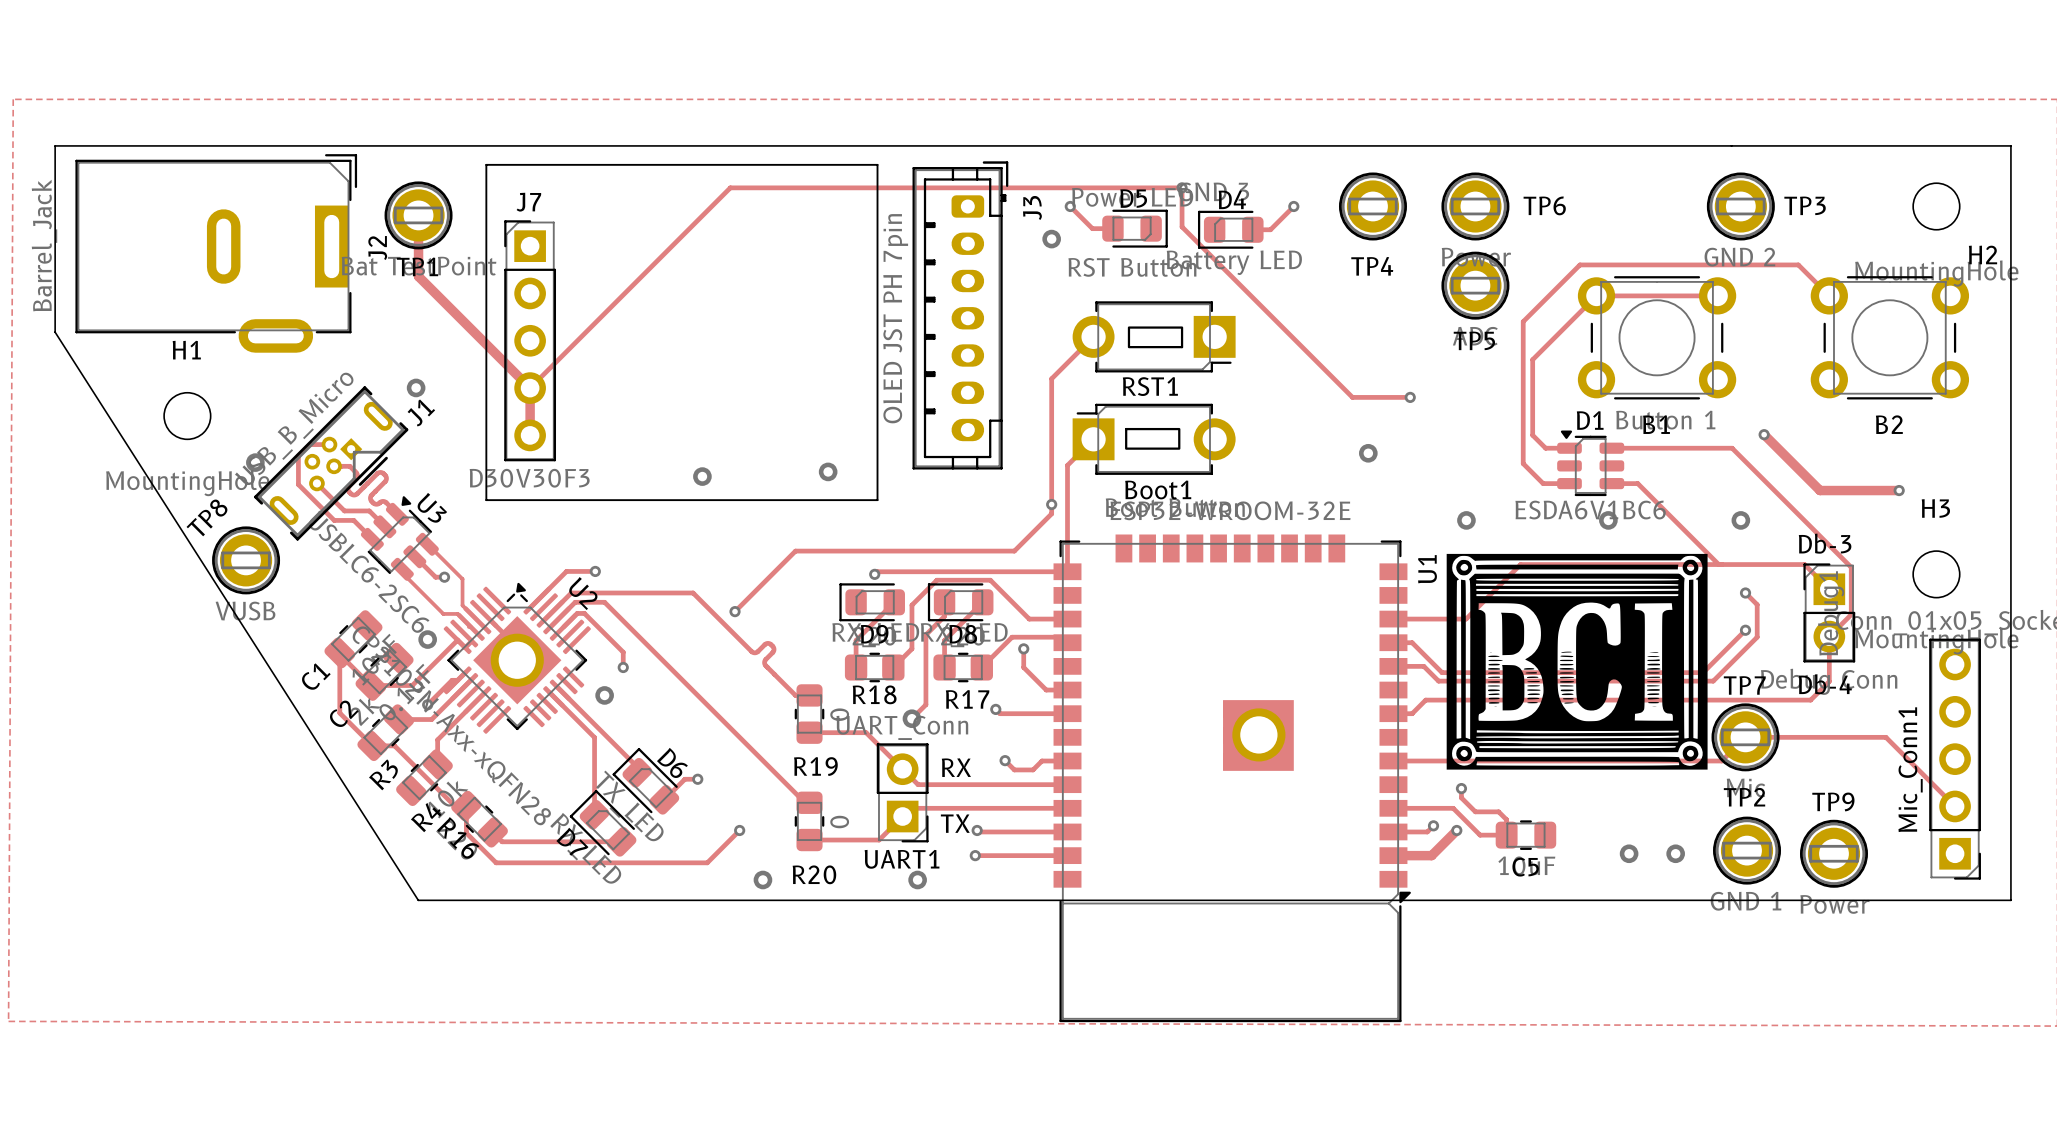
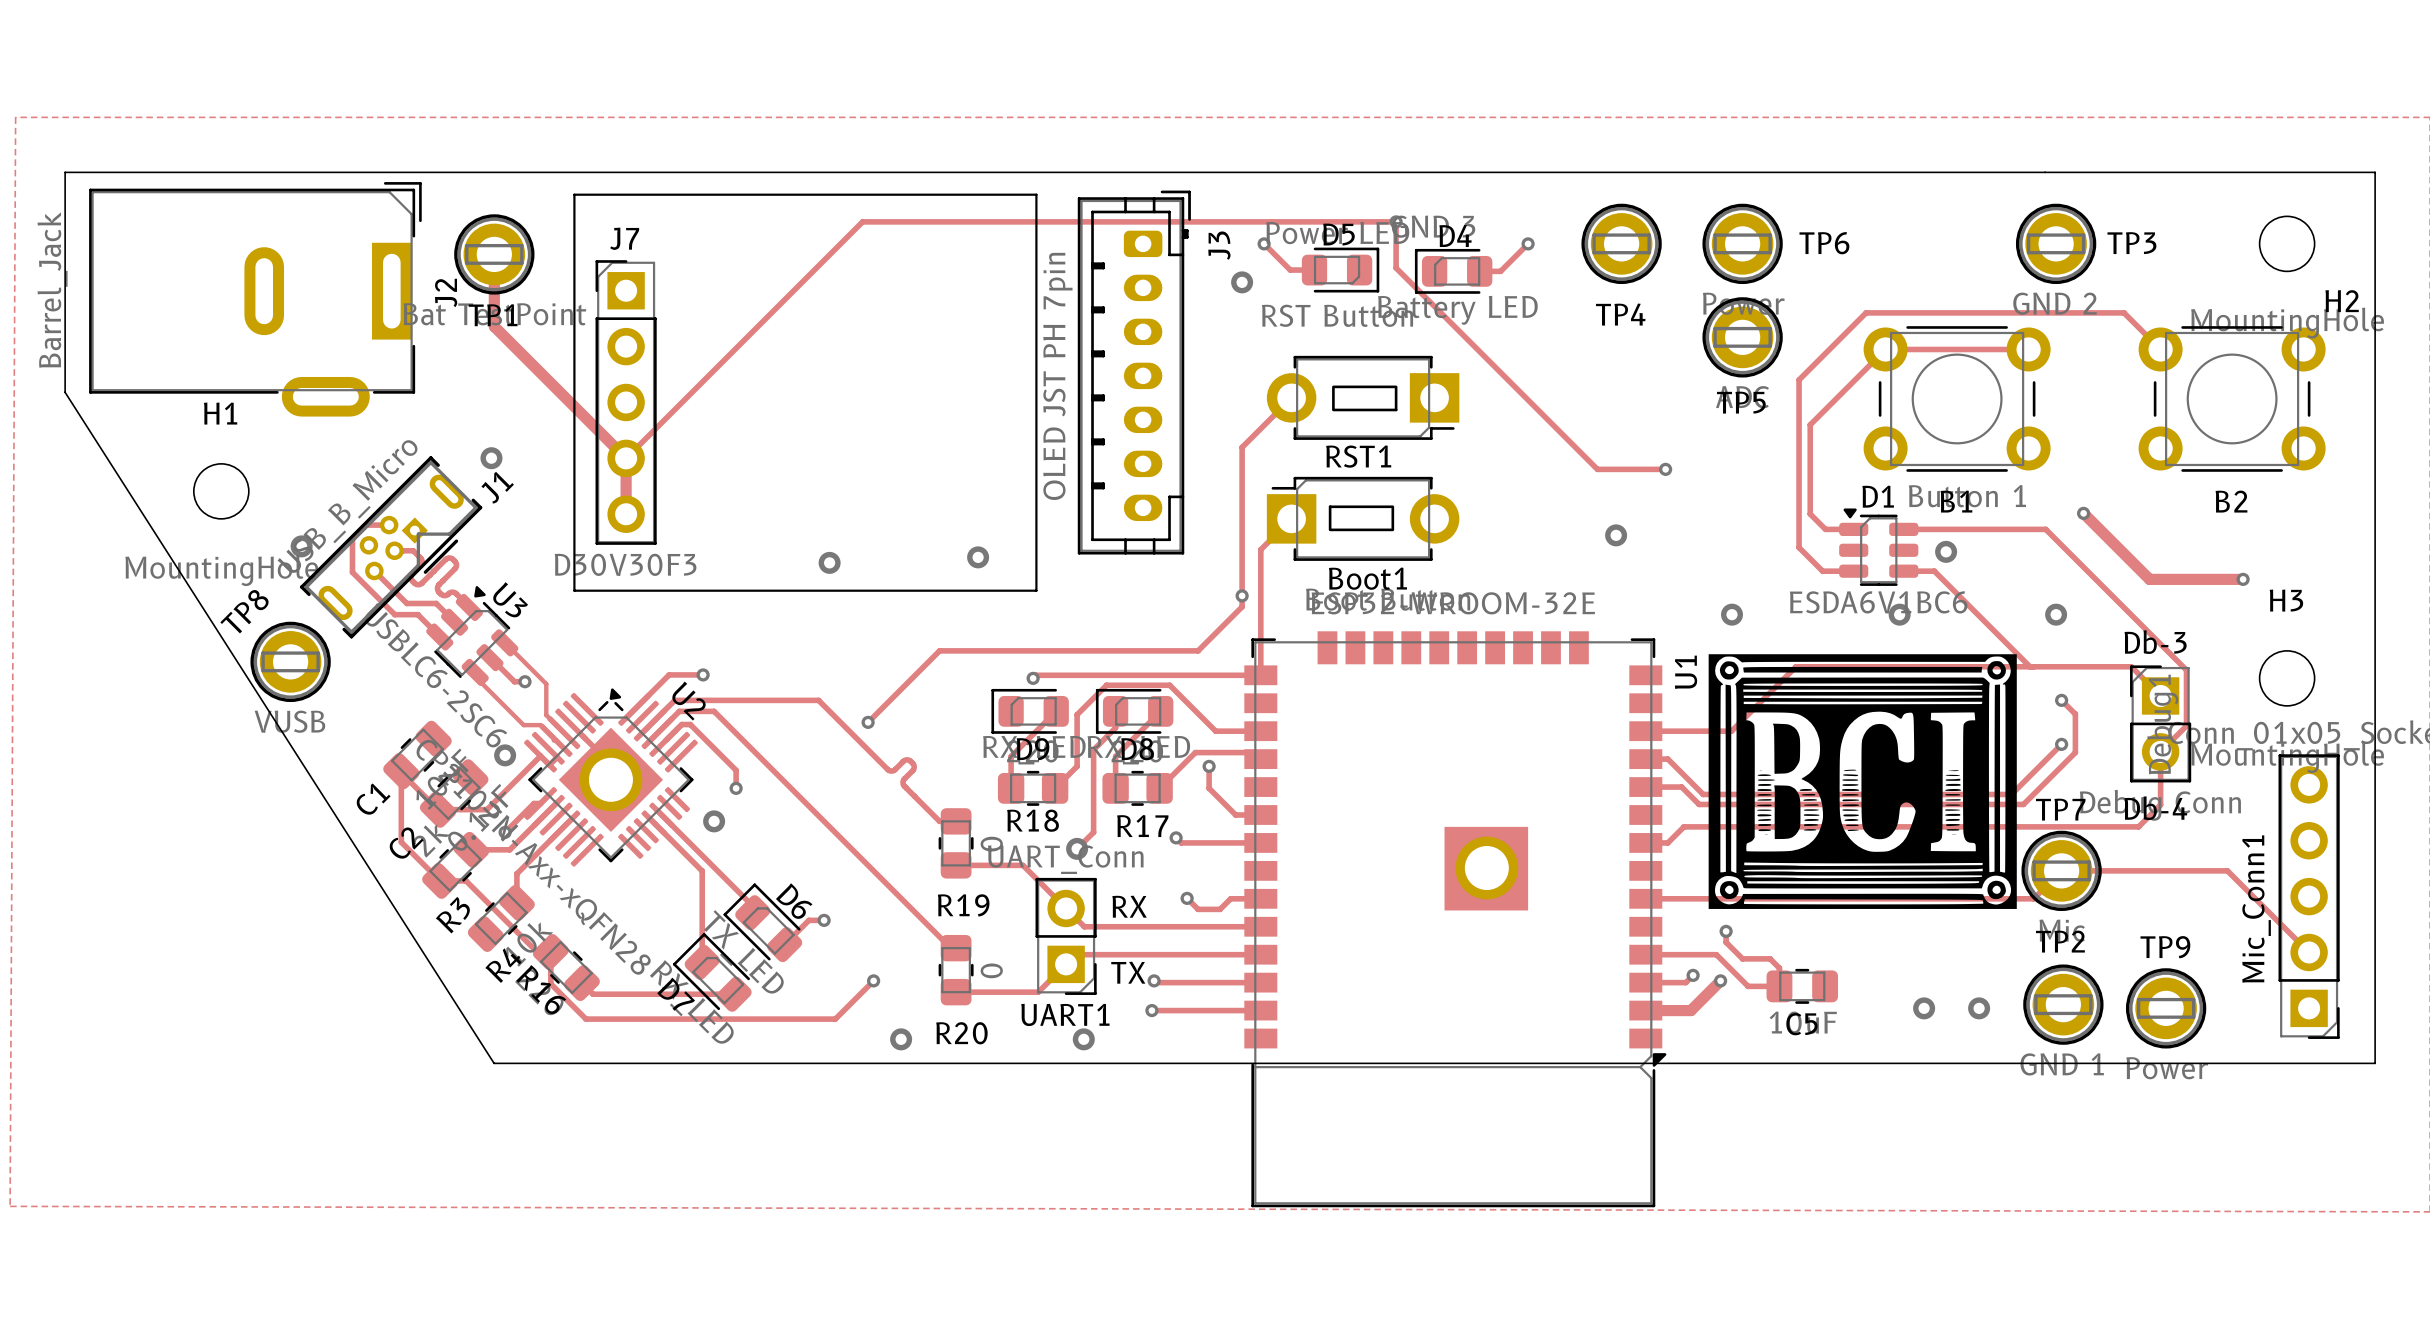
via: none -> (1946, 551)

